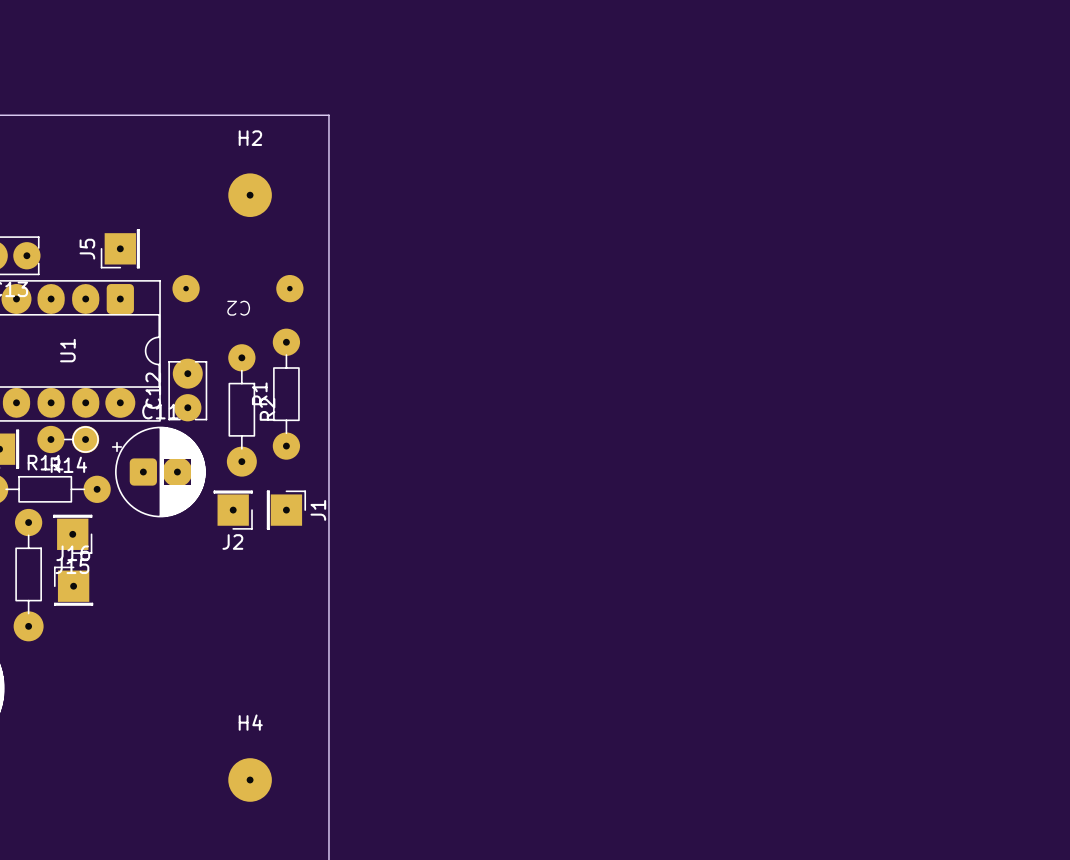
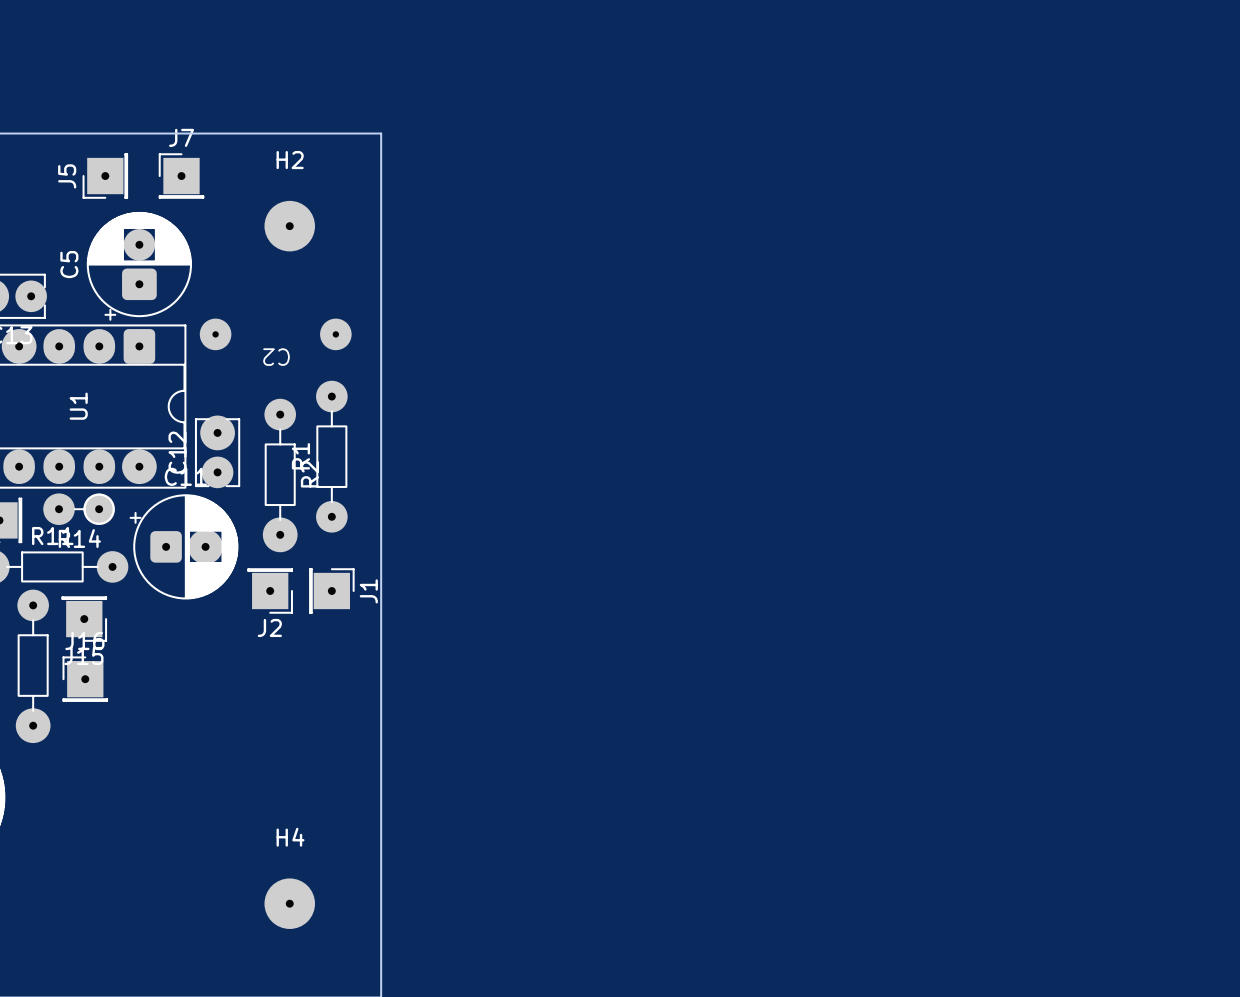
J7: none -> (181, 176)
C5: none -> (139, 266)
J5 position: (120, 248) -> (105, 176)

